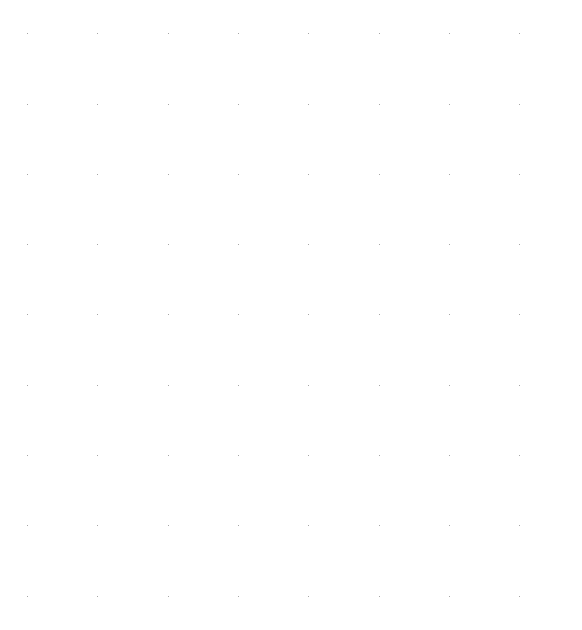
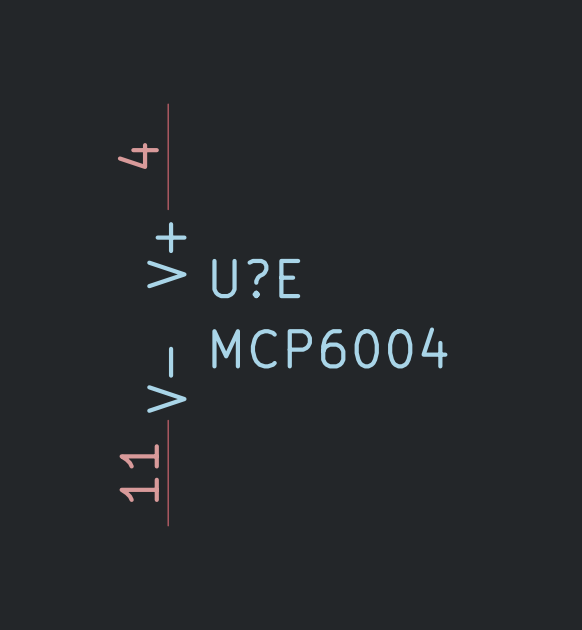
U?E: none -> MCP6004 (168, 314)

